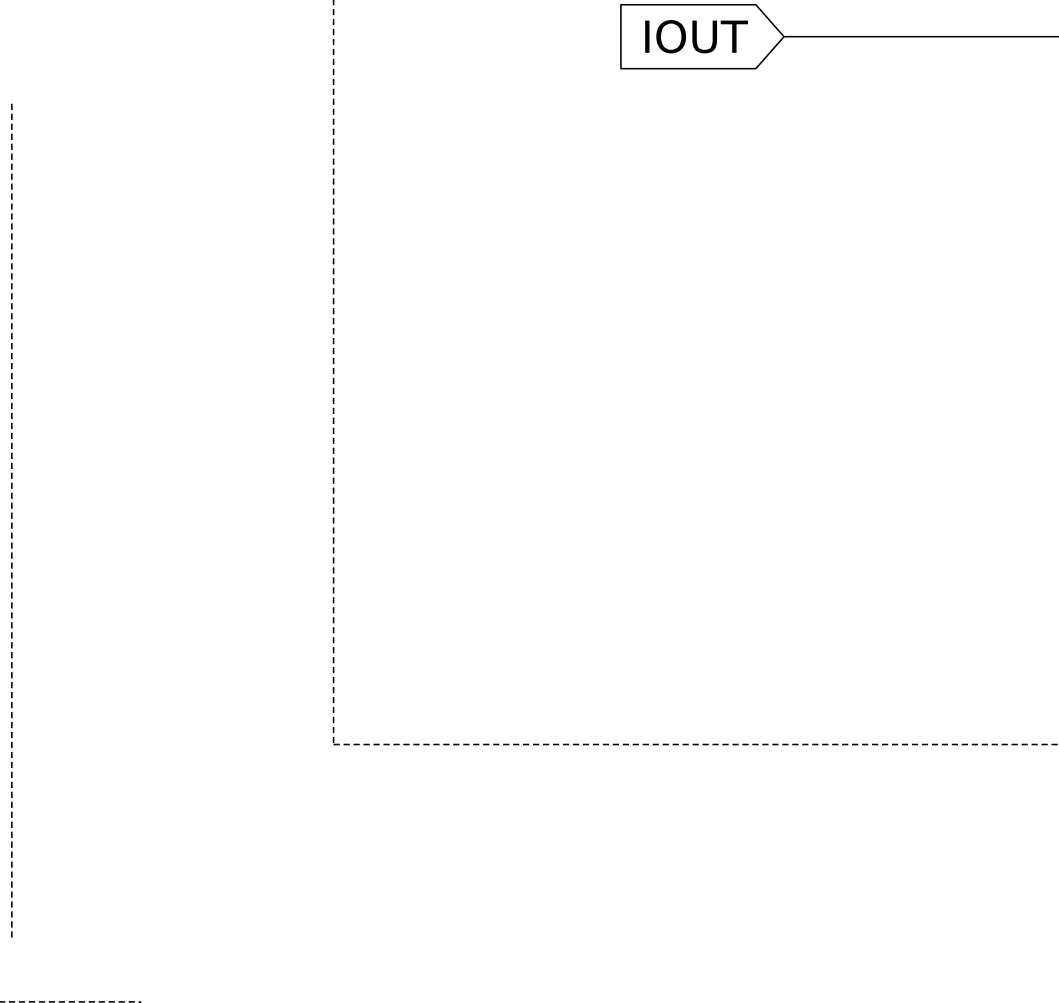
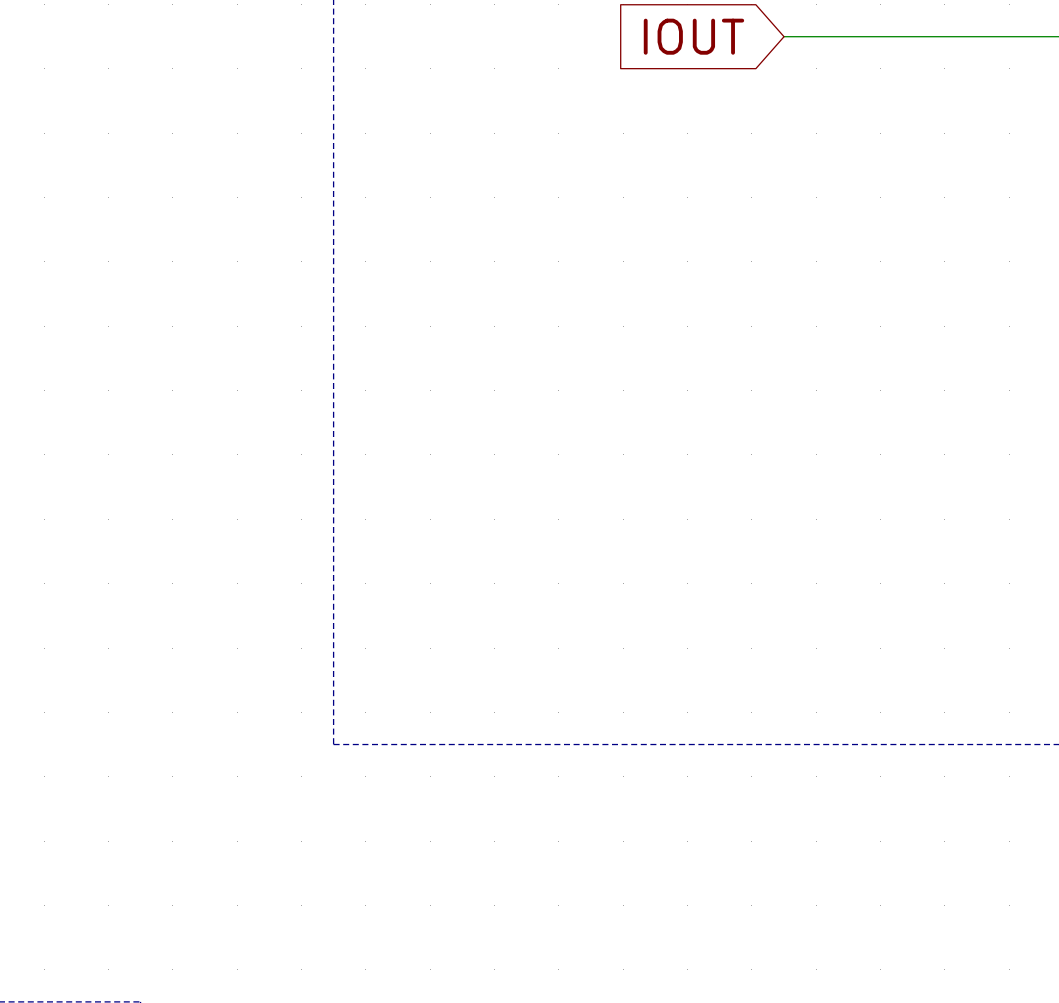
line: (11, 101) (11, 937) -> none

